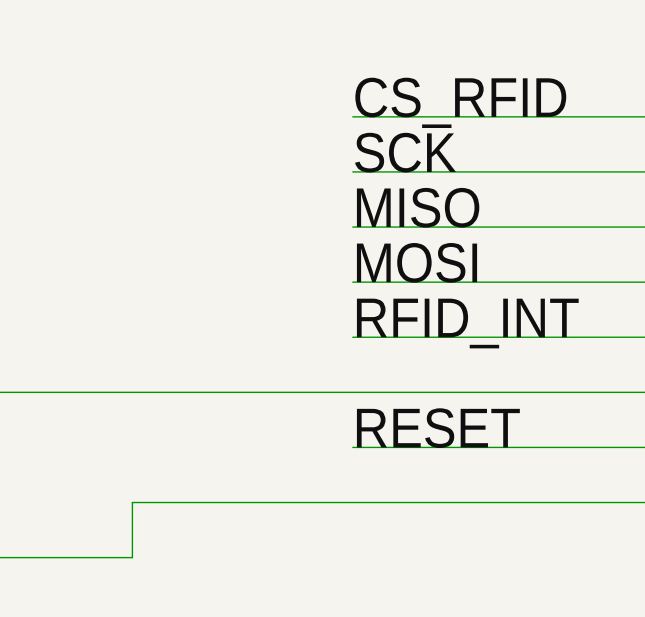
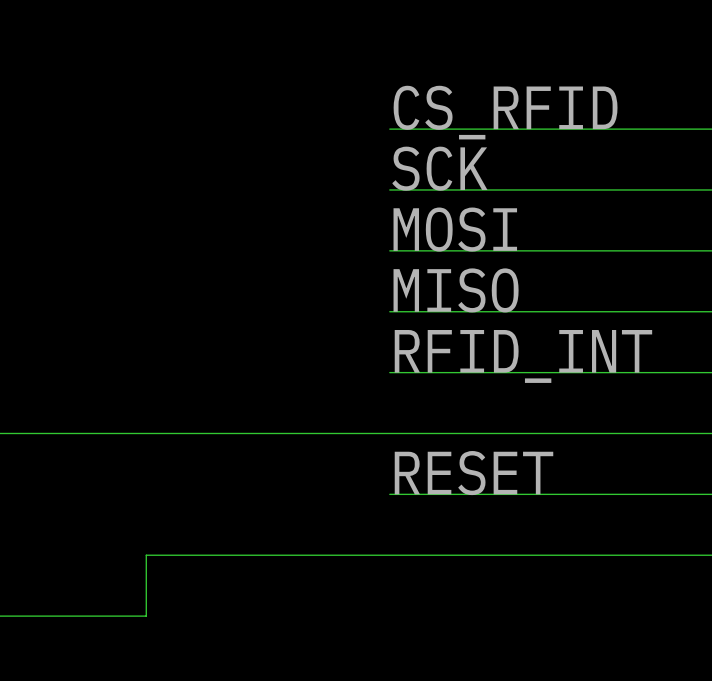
label: MISO (418, 207) -> MOSI (455, 229)
label: MOSI (417, 262) -> MISO (456, 290)

